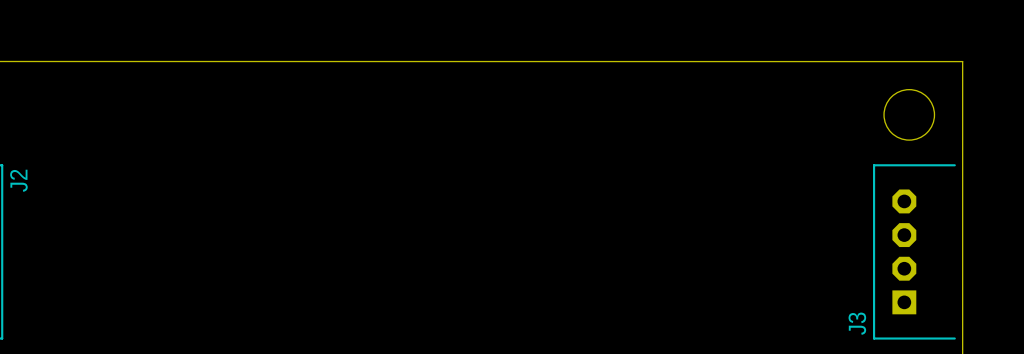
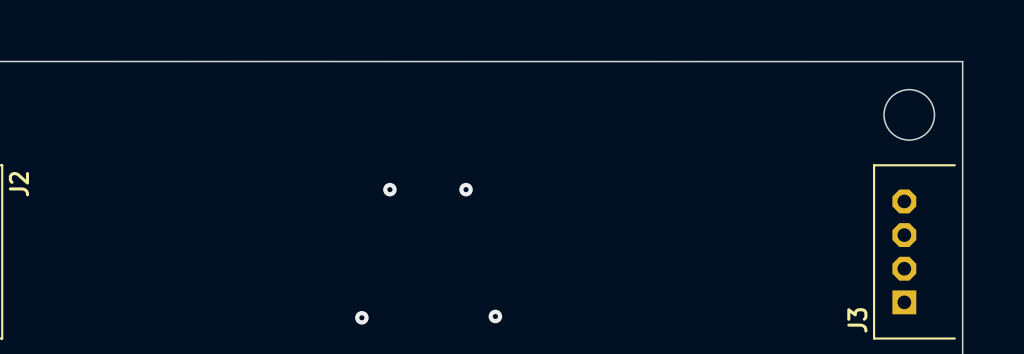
via: none -> (389, 189)
via: none -> (466, 189)
via: none -> (495, 316)
via: none -> (361, 317)

